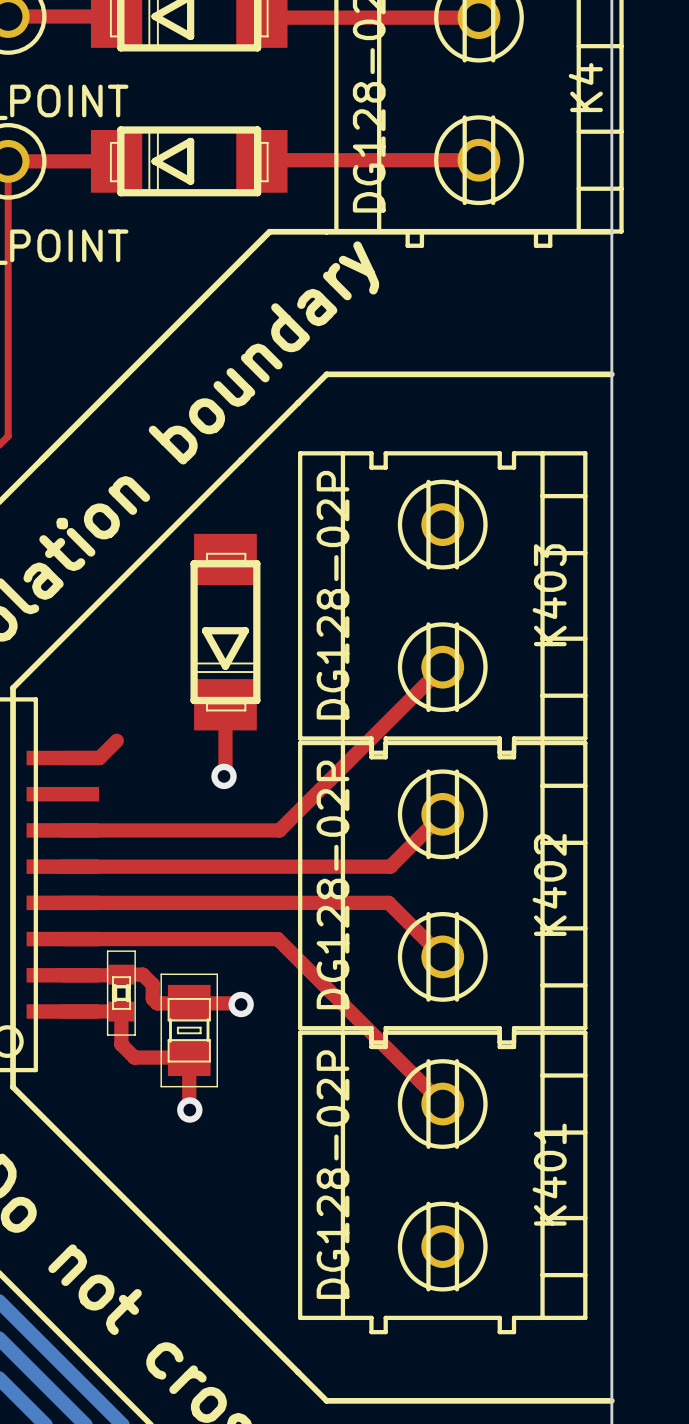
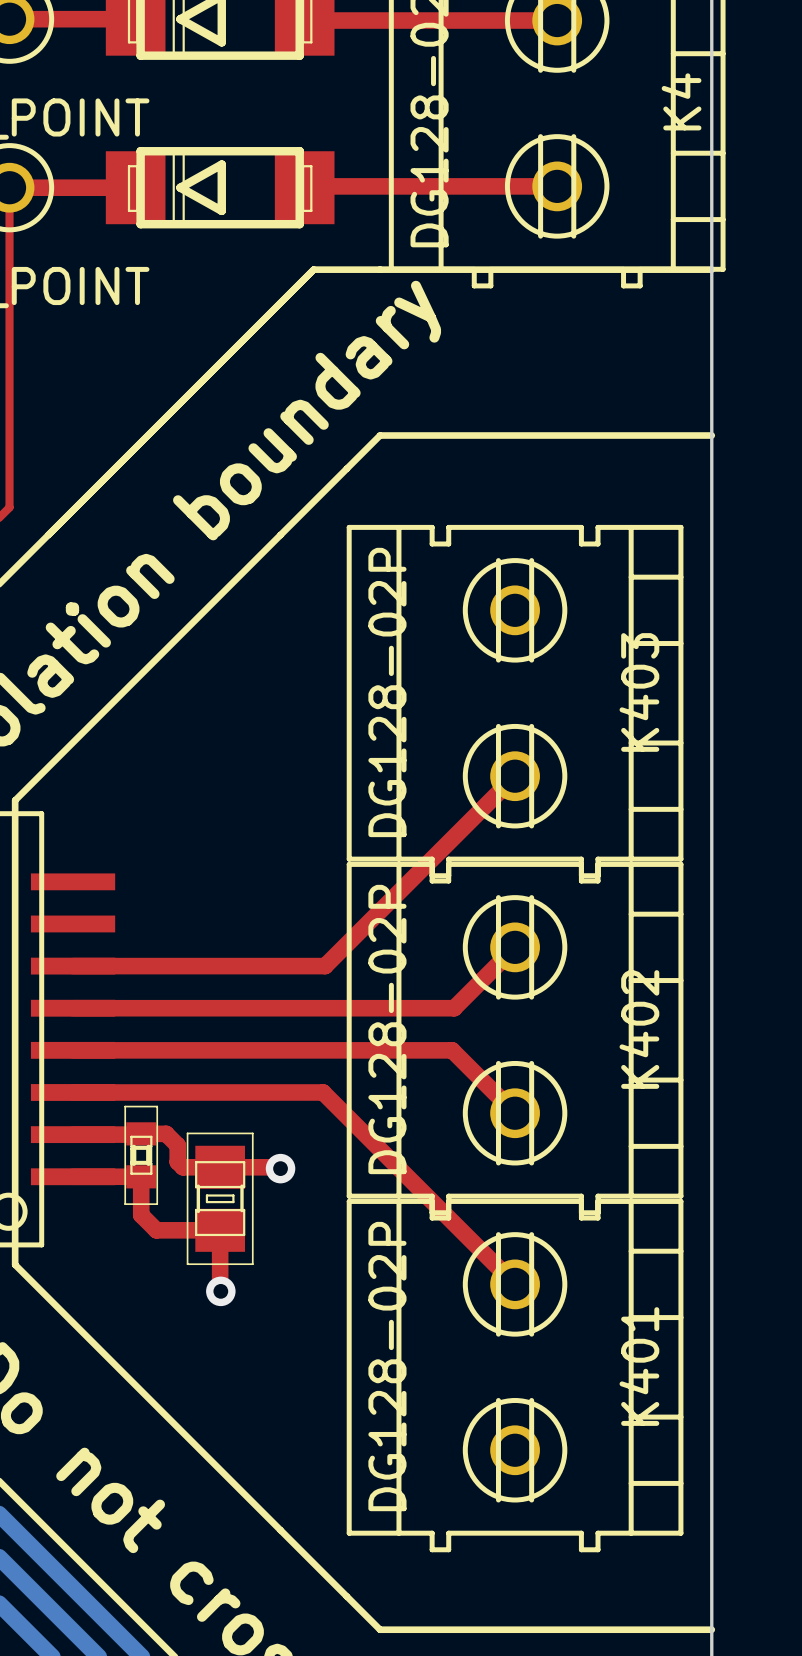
part: (225, 632) -> none
top track: (225, 704) (224, 776) -> none
top track: (116, 740) (99, 758) (62, 758) -> none
via: (224, 776) -> none

